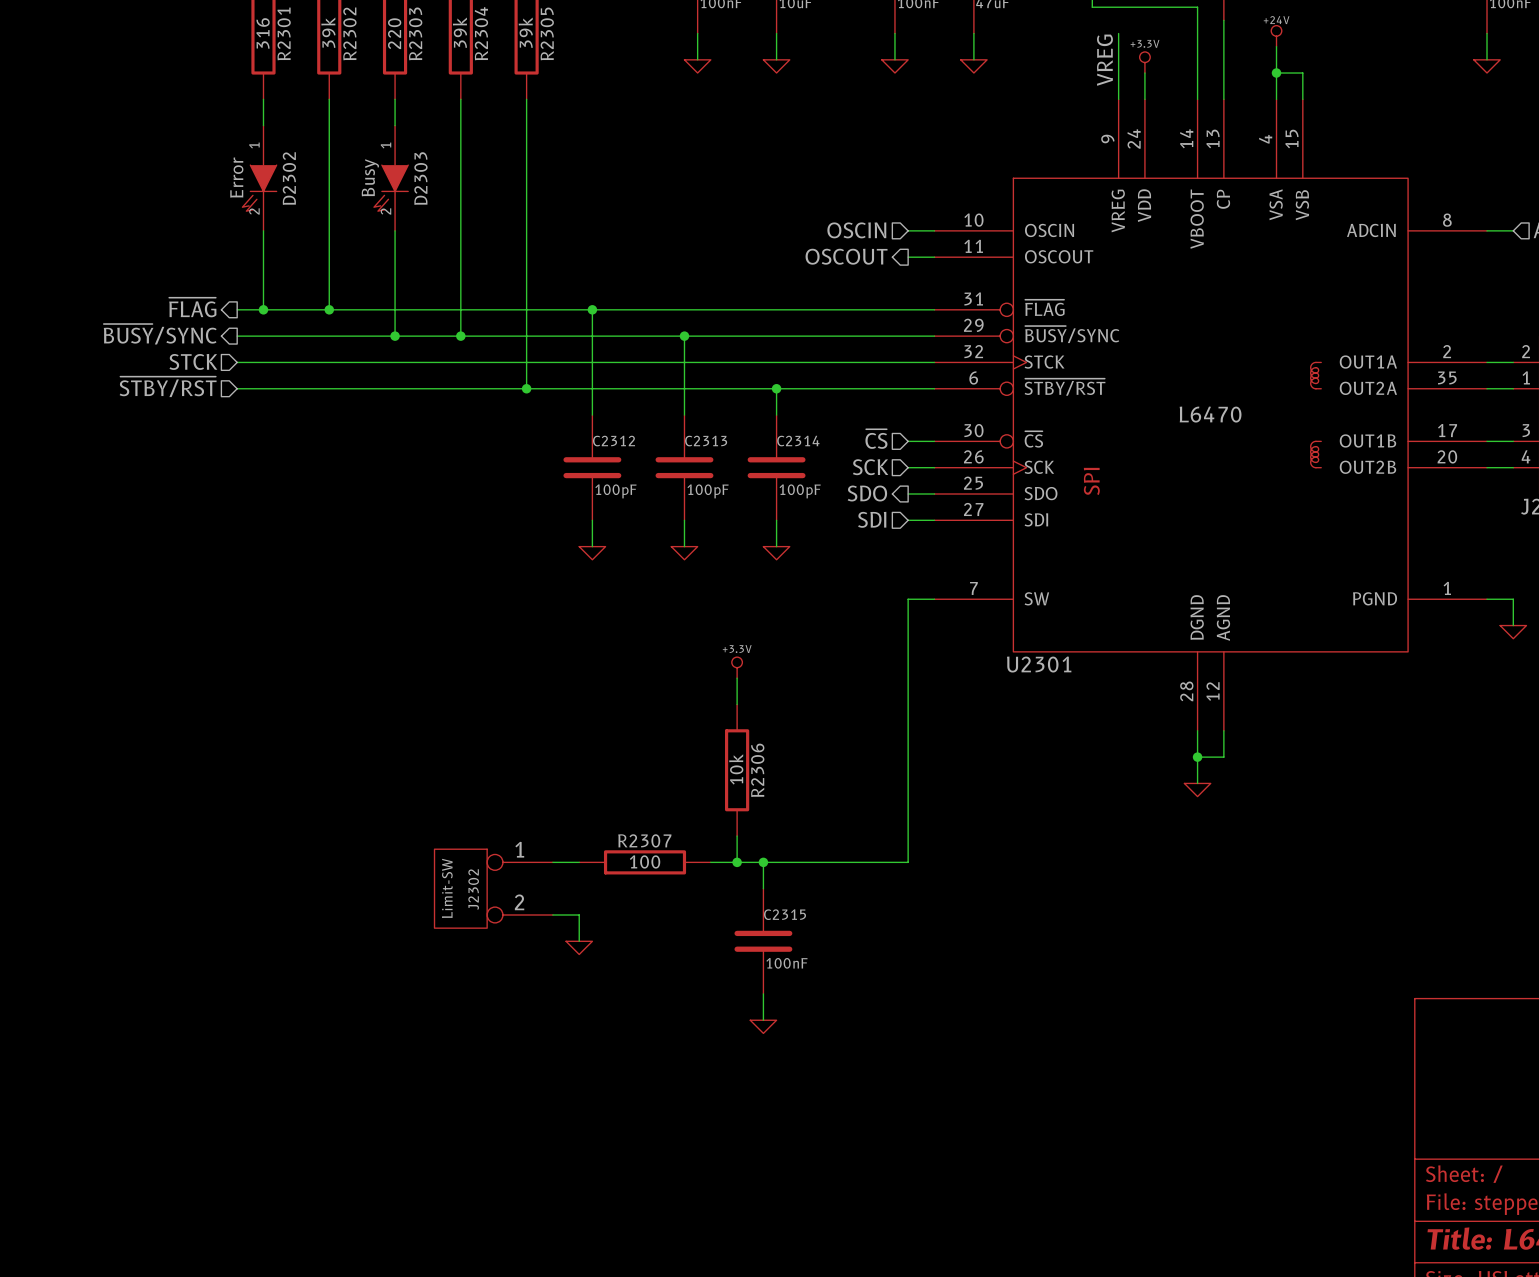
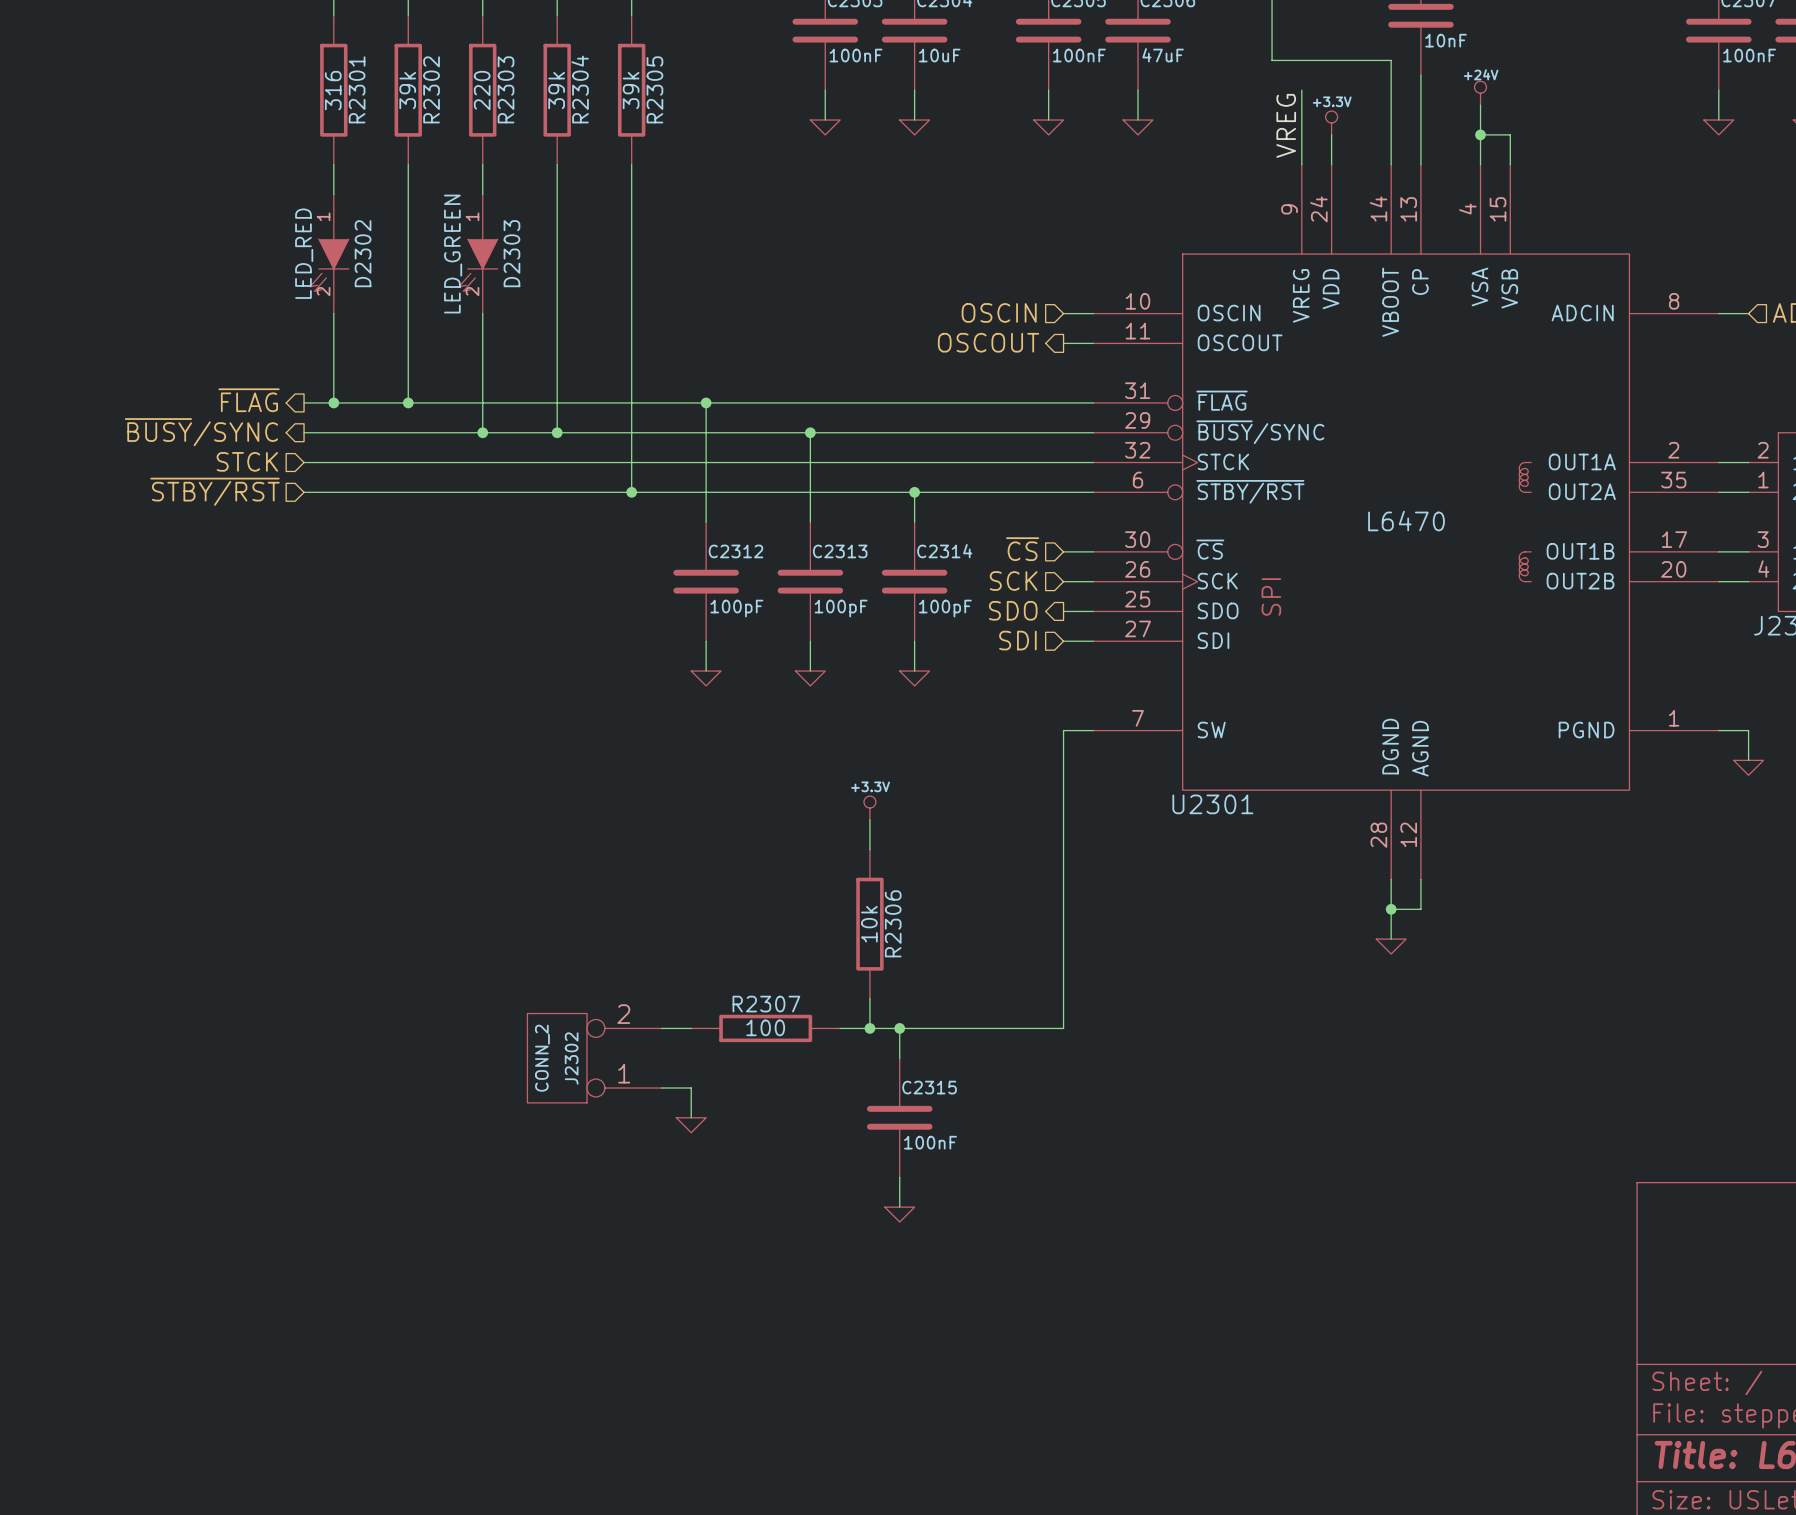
D2302 value: Error (236, 177) -> LED_RED (304, 253)
D2303 value: Busy (370, 177) -> LED_GREEN (453, 254)
J2302 value: Limit-SW (447, 888) -> CONN_2 (542, 1058)
J2302 flip: as is (460, 888) -> up-down (557, 1058)

